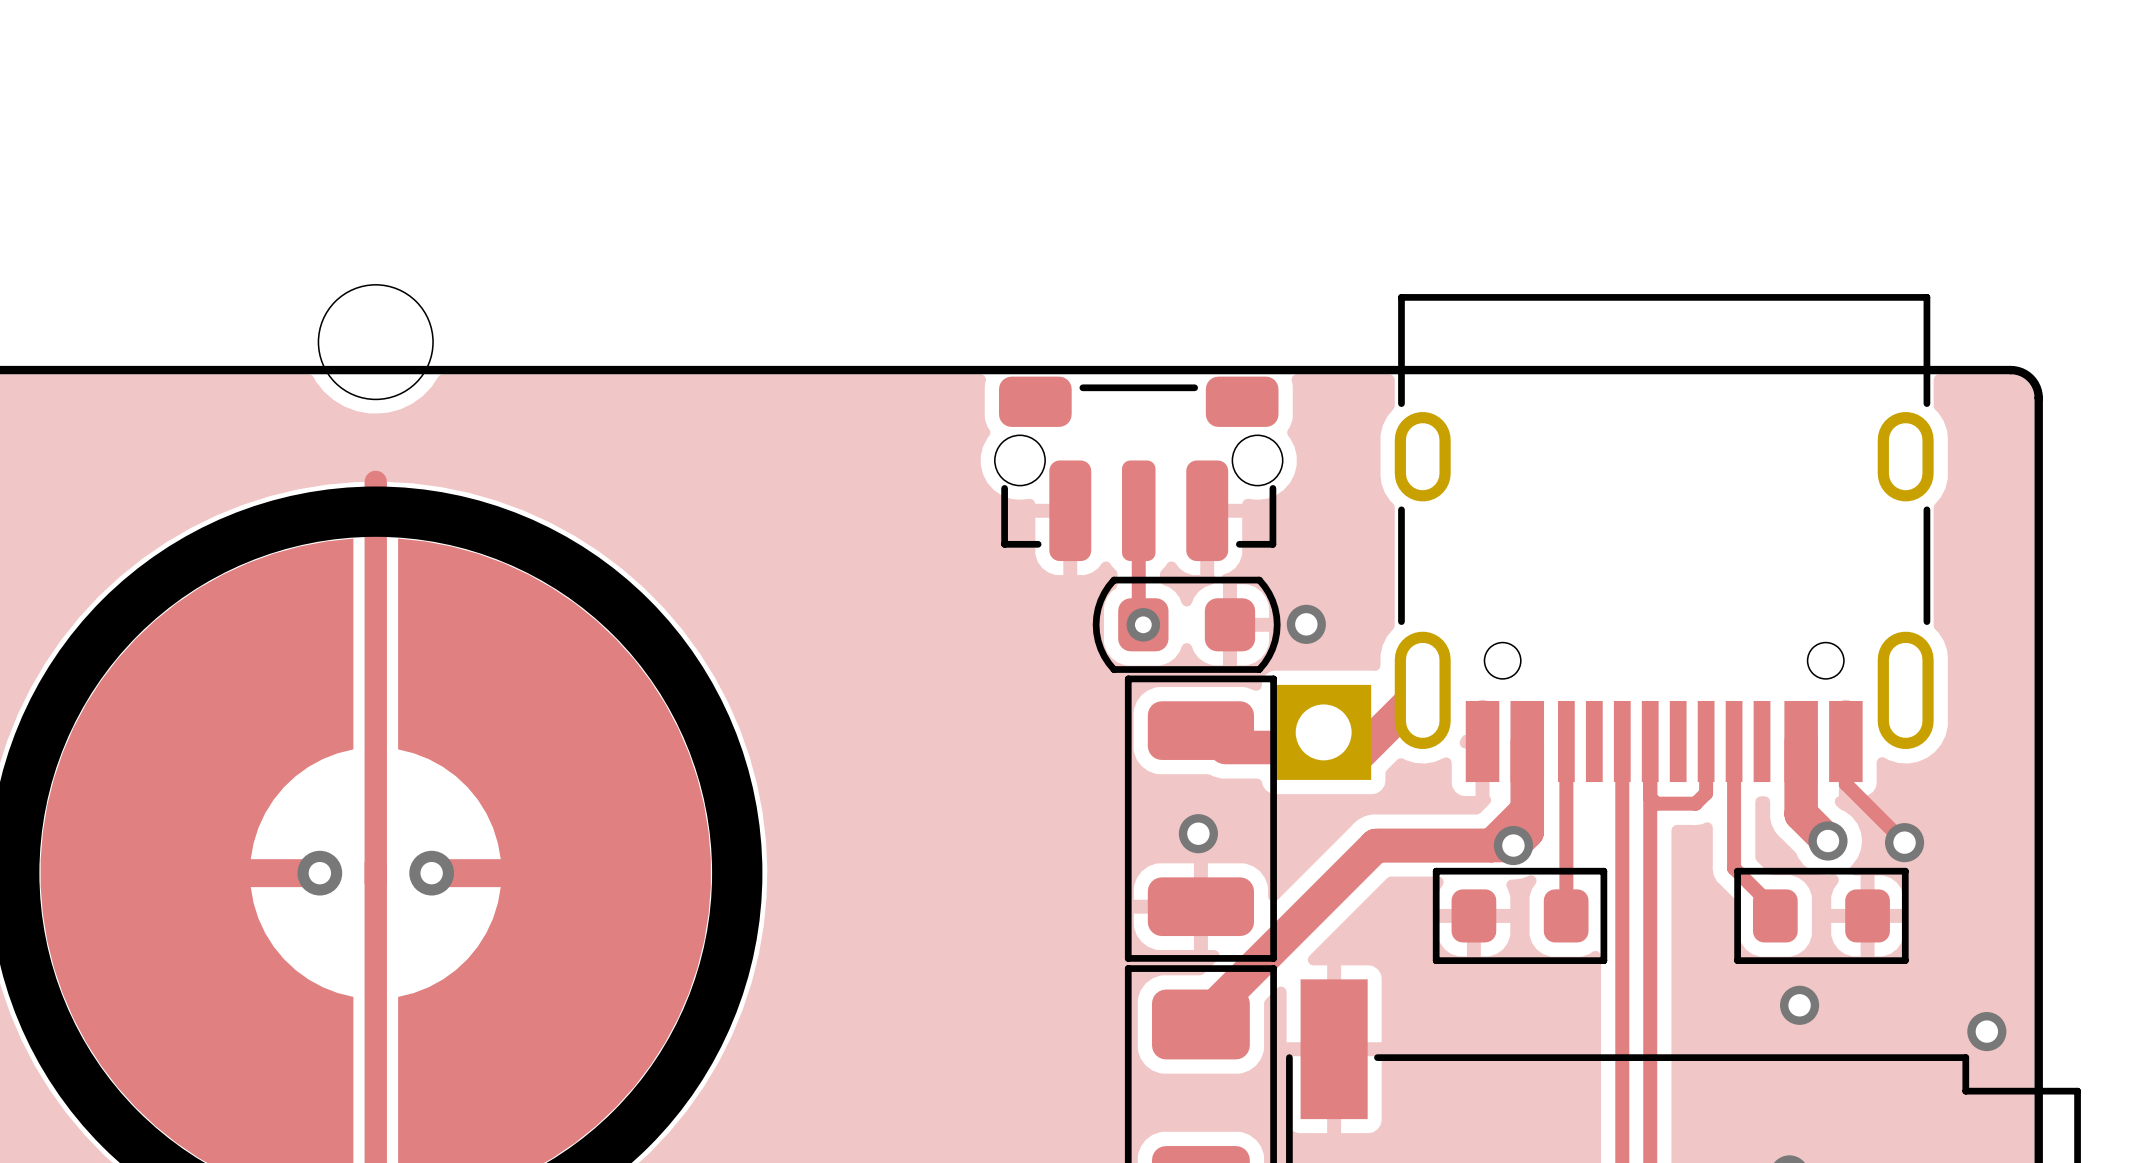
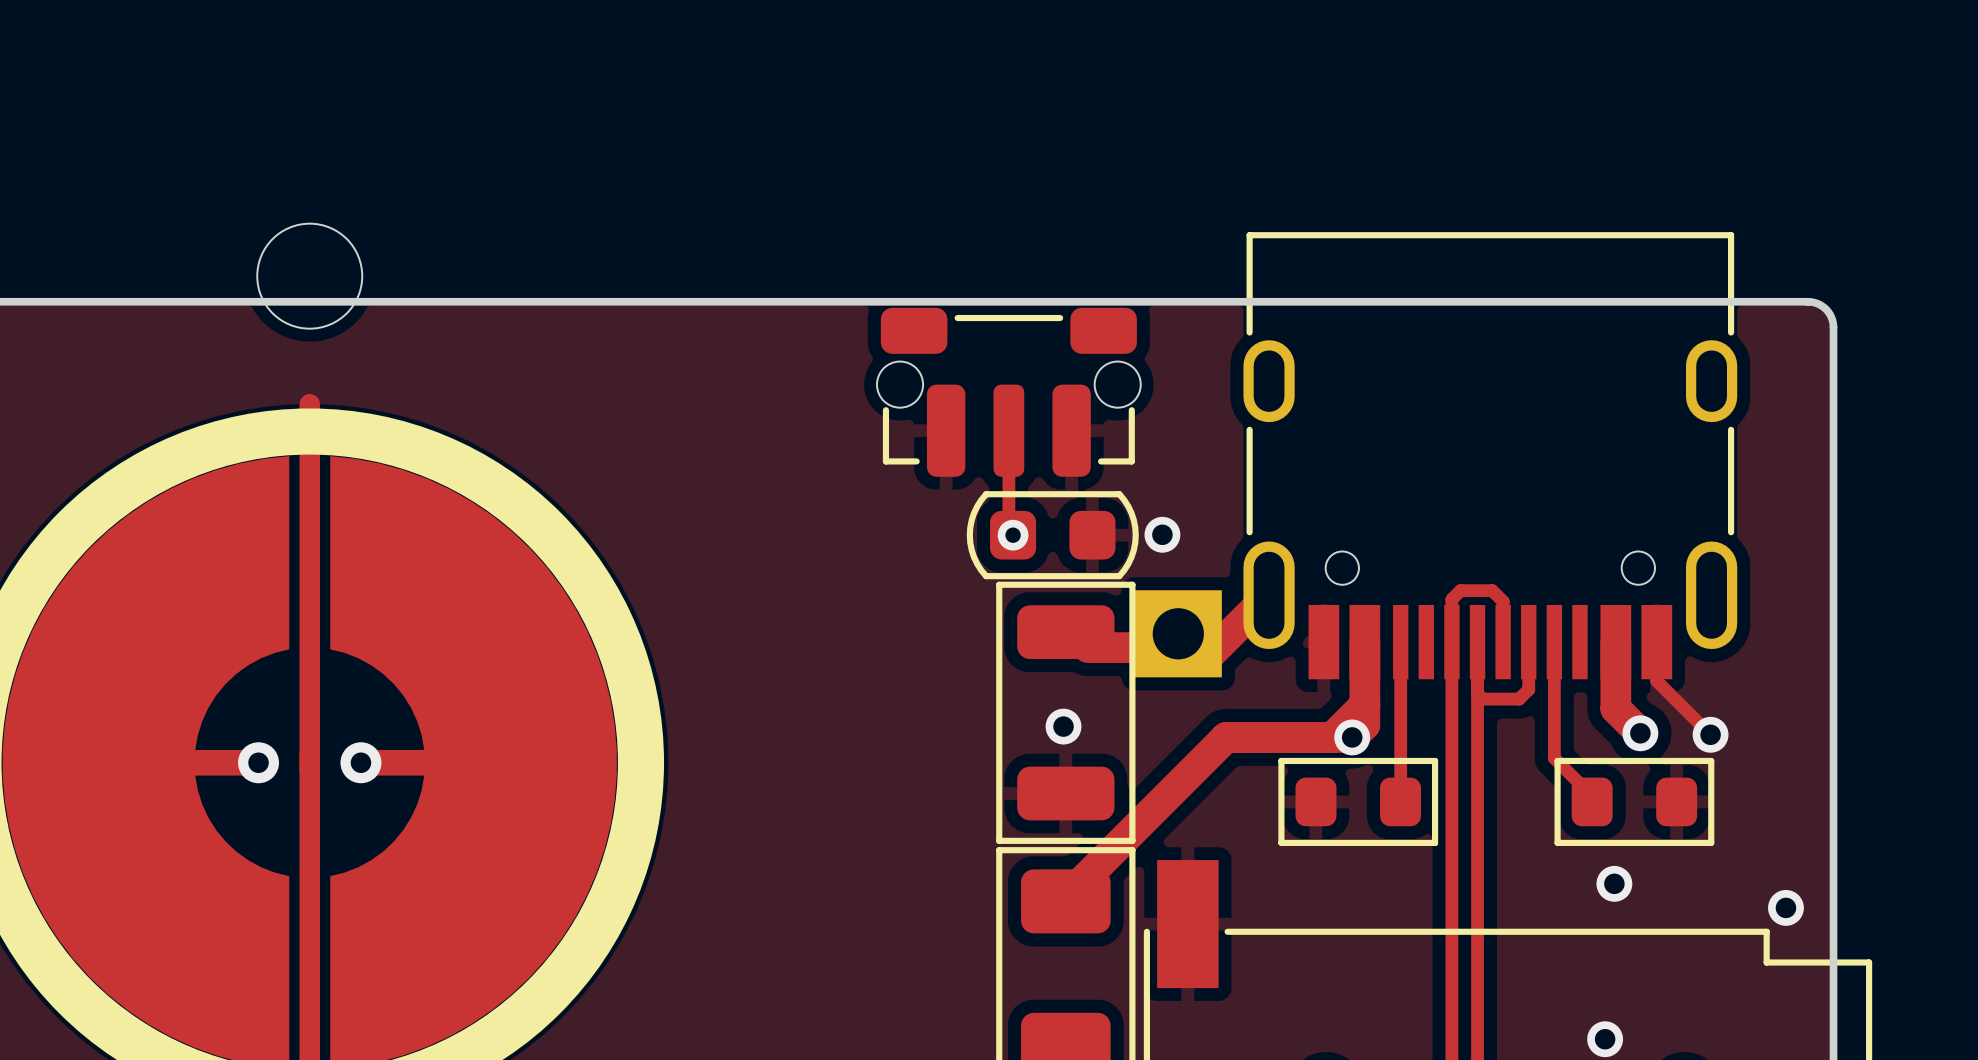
track: none -> (1451, 642) (1451, 599) (1460, 590) (1492, 590) (1503, 601) (1503, 642)

